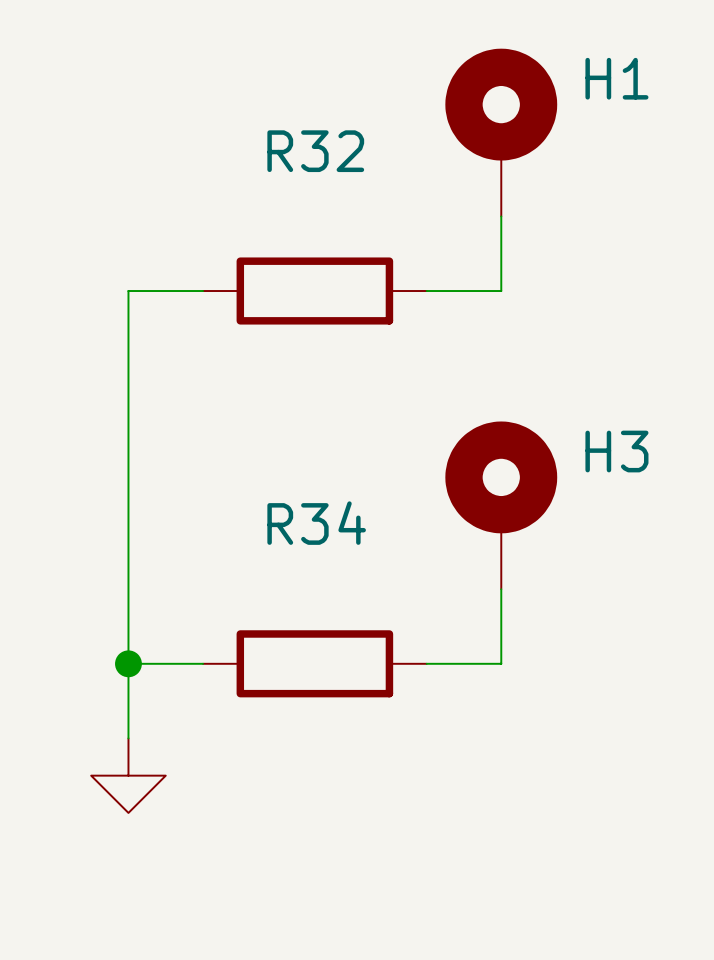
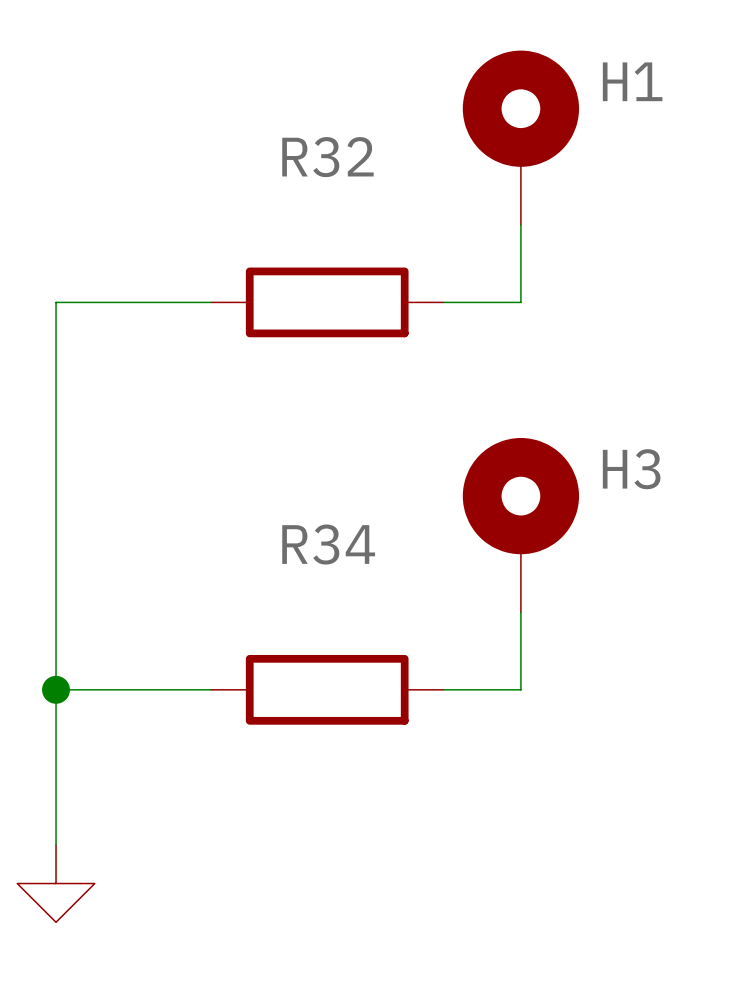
wire: (128, 291) (128, 738) -> (133, 302) (56, 302) (56, 844)
wire: none -> (56, 689) (133, 689)
junction position: (128, 663) -> (56, 689)
power symbol position: (128, 775) -> (56, 883)

